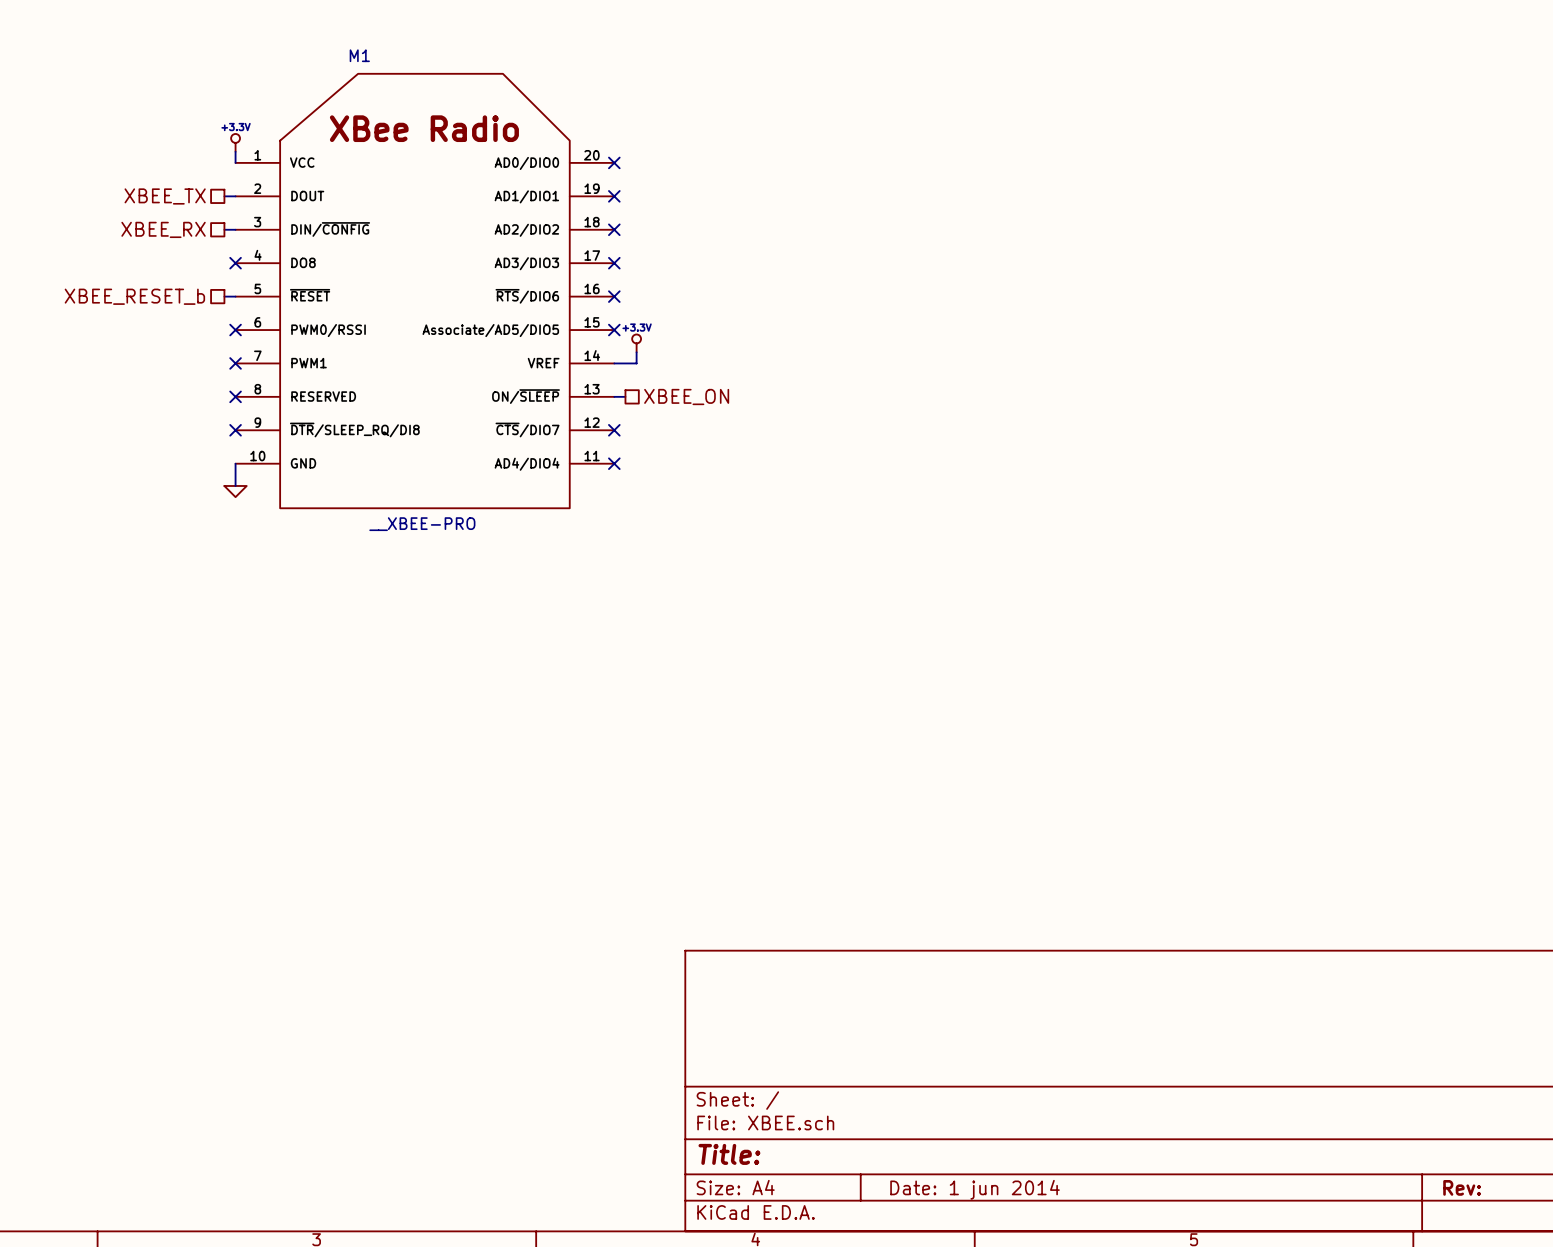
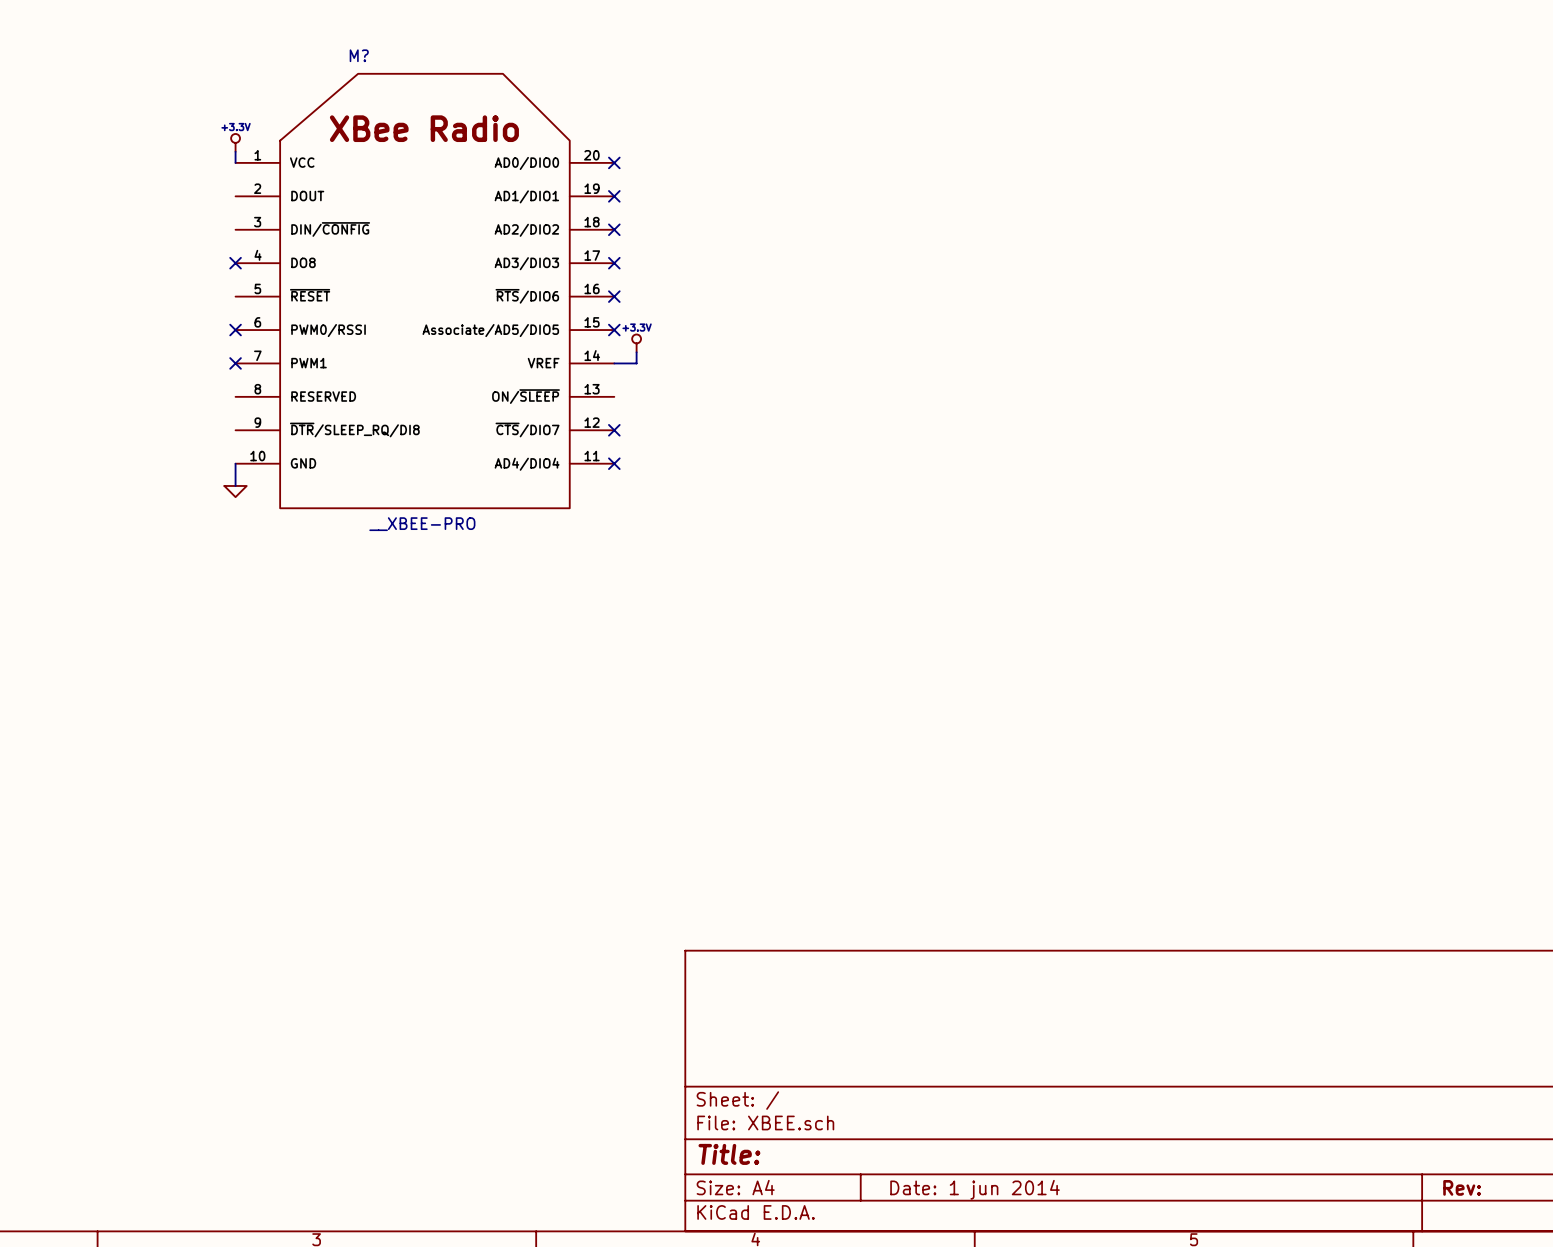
M1 name: M1 (359, 55) -> M? (359, 55)
hierarchical label: XBEE_TX (165, 196) -> none
wire: (224, 196) (235, 196) -> none
hierarchical label: XBEE_RX (163, 229) -> none
wire: (224, 229) (235, 229) -> none
hierarchical label: XBEE_RESET_b (134, 296) -> none
wire: (224, 296) (235, 296) -> none
no-connect mark: (235, 396) -> none
wire: (614, 396) (625, 396) -> none
hierarchical label: XBEE_ON (686, 397) -> none
no-connect mark: (235, 430) -> none

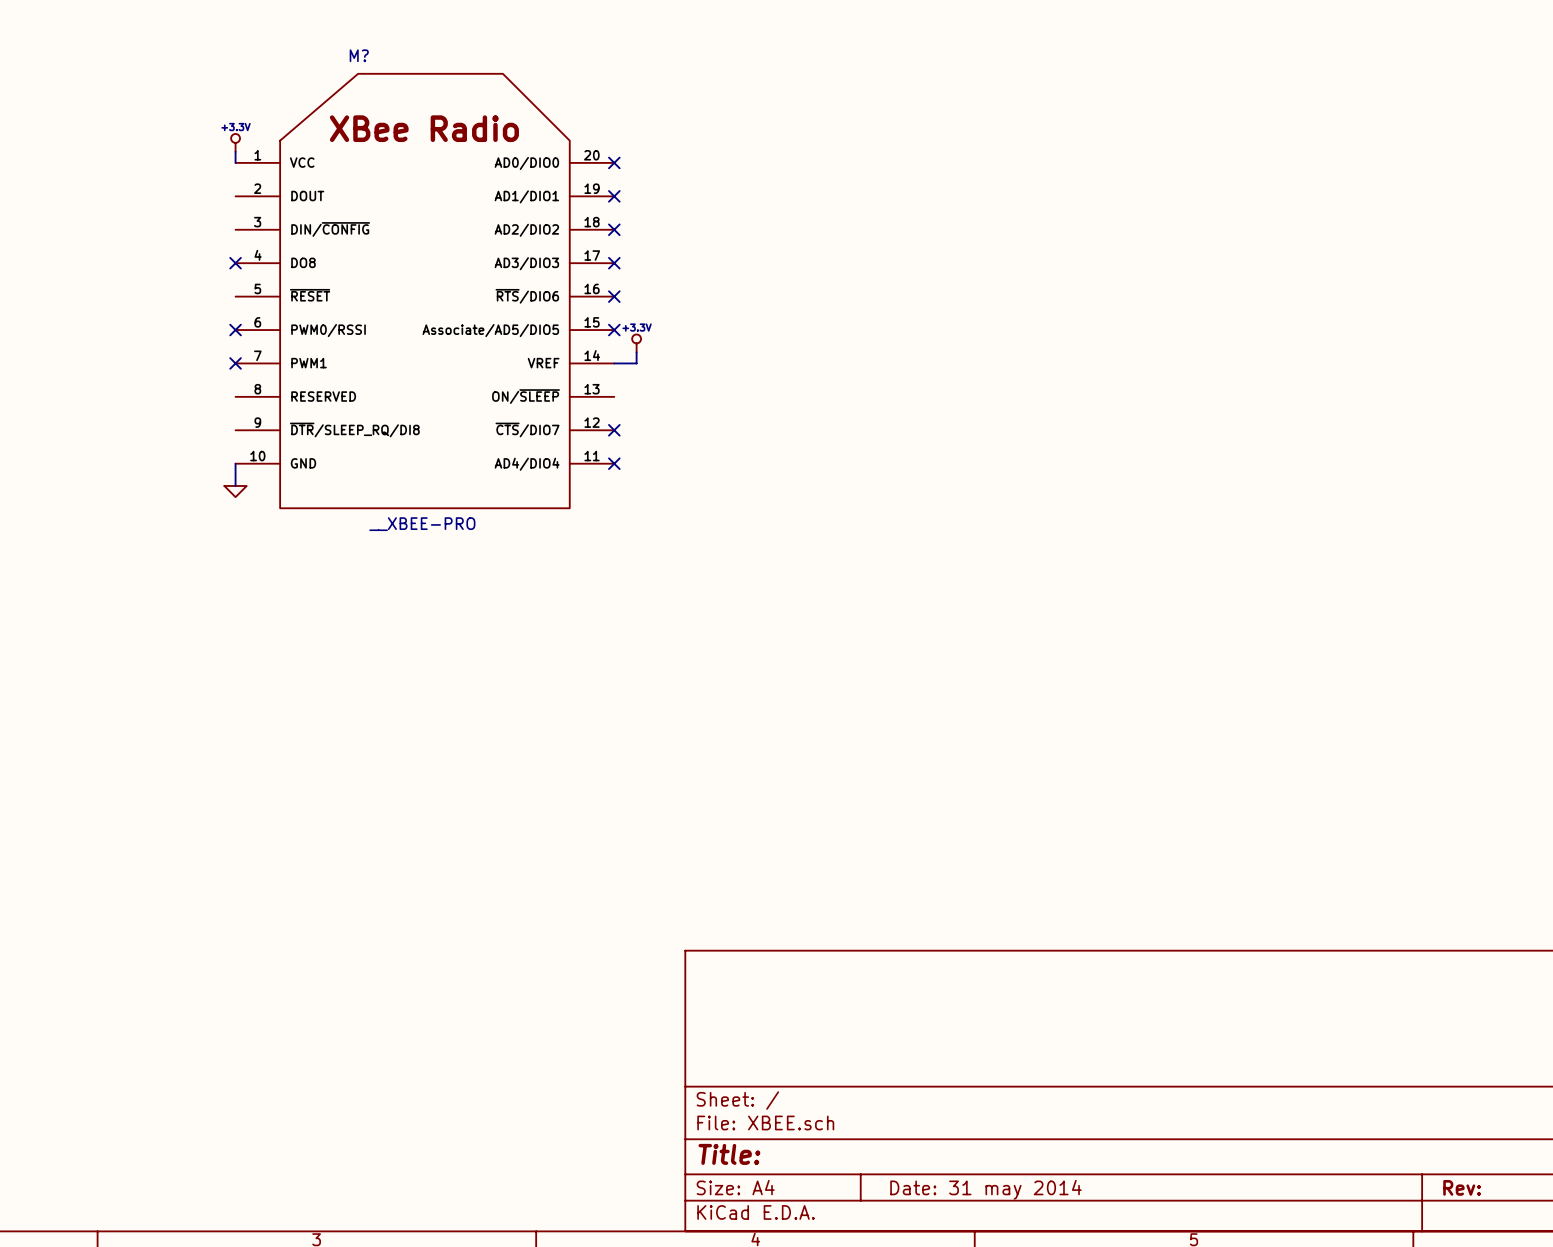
title block: Date: 1 jun 2014 (975, 1189) -> Date: 31 may 2014 (985, 1189)

